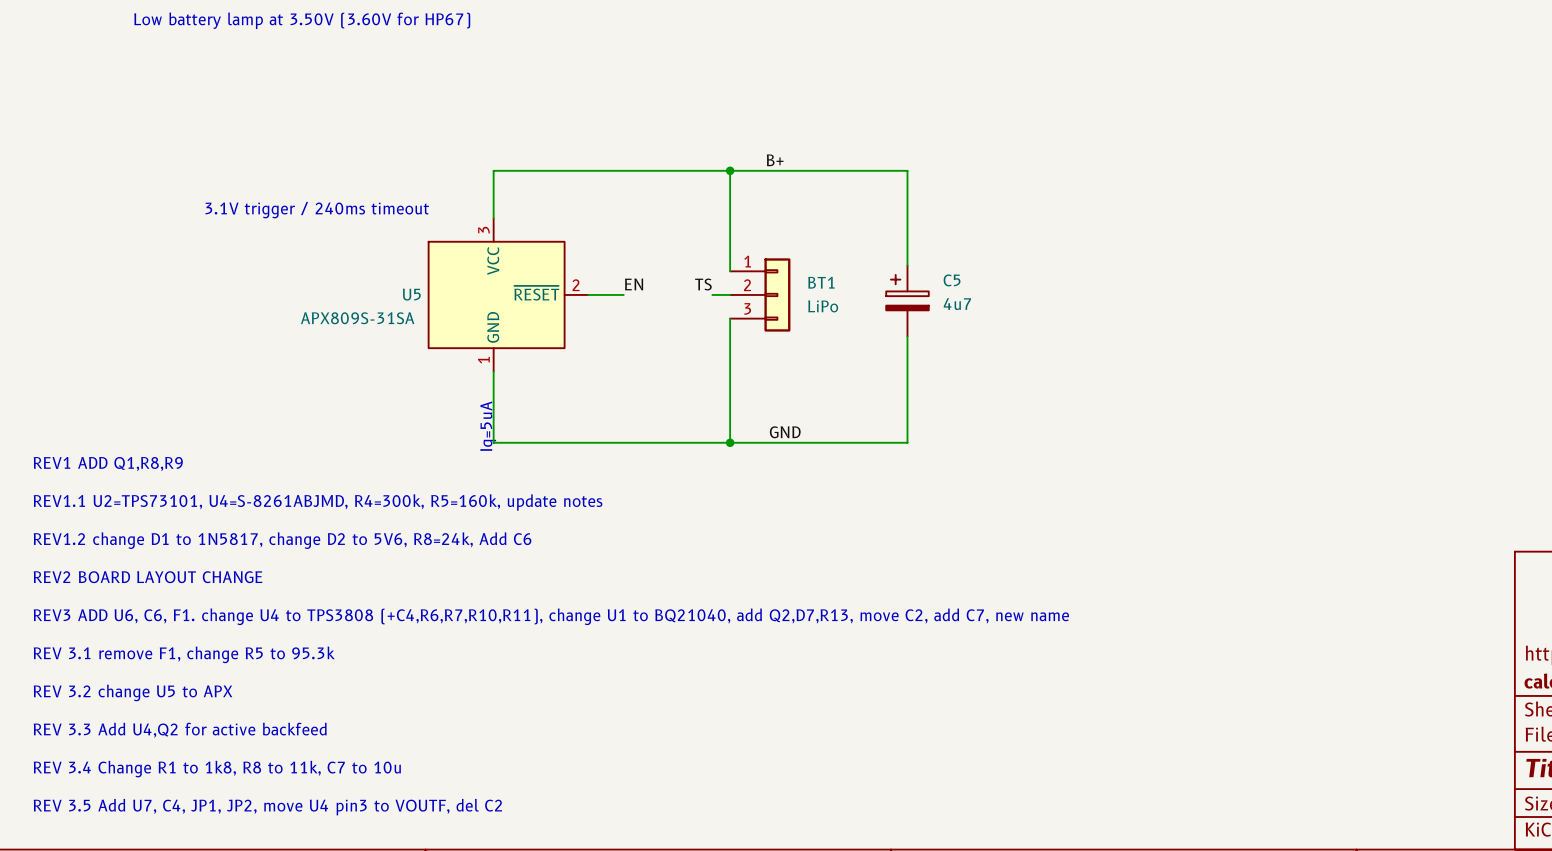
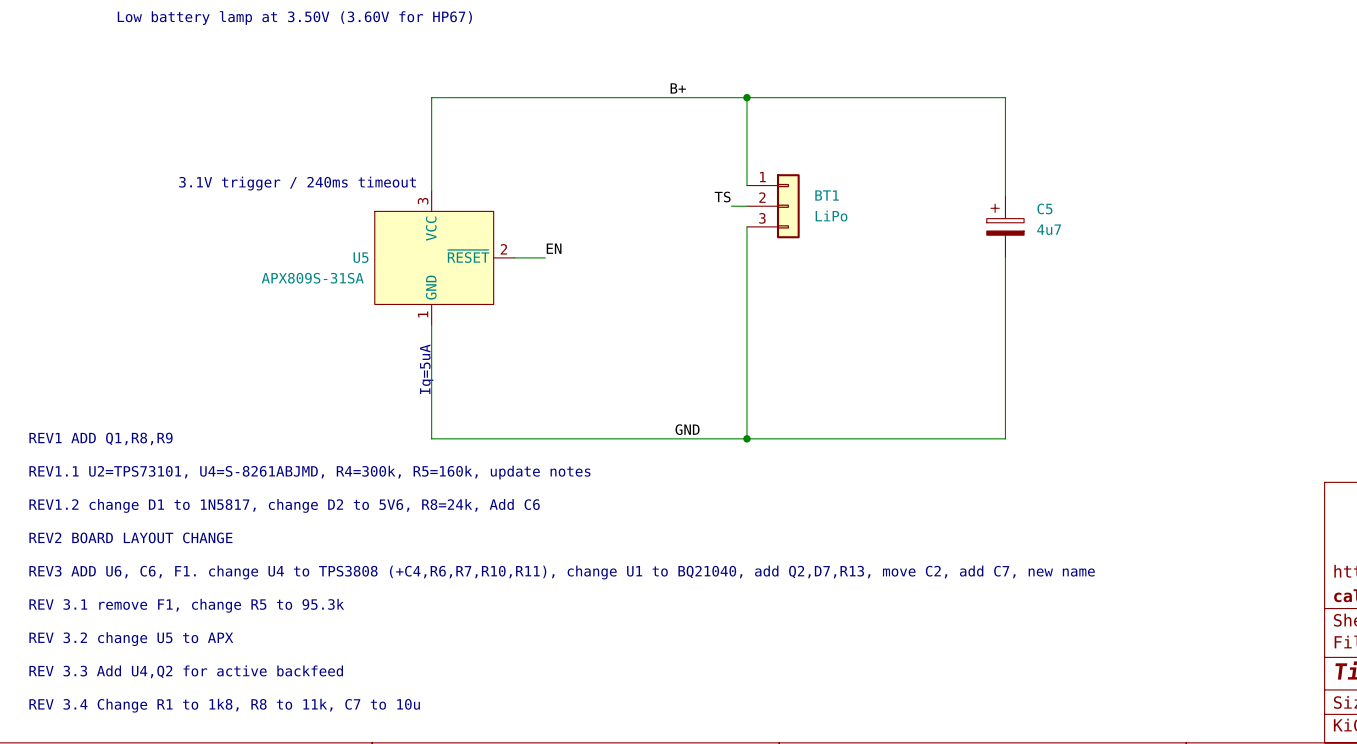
junction: none -> (746, 97)
label position: B+ (775, 160) -> B+ (678, 88)
wire: (493, 170) (907, 170) (907, 265) -> (431, 149) (431, 97) (1005, 97) (1005, 195)
wire: (730, 170) (730, 271) -> (746, 97) (746, 185)
junction: (730, 170) -> none
wire: none -> (746, 226) (746, 438)
label position: TS (703, 284) -> TS (722, 197)
wire: (712, 294) (730, 294) -> (731, 206) (746, 206)
BT1 position: (760, 294) -> (773, 206)
C5 position: (907, 300) -> (1005, 226)
wire: (730, 318) (730, 442) -> none
wire: (907, 336) (907, 442) (493, 442) -> (1005, 257) (1005, 438) (431, 438) (431, 387)
label position: GND (785, 432) -> GND (687, 429)
junction: (730, 442) -> none
text: REV1 ADD Q1,R8,R9 (108, 464) -> none
junction: none -> (746, 438)
text: REV1.1 U2=TPS73101, U4=S-8261ABJMD, R4=300k, R5=160k, update notes (318, 502) -> REV1 ADD Q1,R8,R9 (101, 438)
text: REV1.2 change D1 to 1N5817, change D2 to 5V6, R8=24k, Add C6 (282, 540) -> REV1.1 U2=TPS73101, U4=S-8261ABJMD, R4=300k, R5=160k, update notes (309, 472)
text: REV2 BOARD LAYOUT CHANGE (148, 577) -> REV1.2 change D1 to 1N5817, change D2 to 5V6, R8=24k, Add C6 (284, 505)
text: REV3 ADD U6, C6, F1. change U4 to TPS3808 (+C4,R6,R7,R10,R11), change U1 to BQ21040, add Q2,D7,R13, move C2, add C7, new name (551, 616) -> REV2 BOARD LAYOUT CHANGE (130, 537)
text: REV 3.1 remove F1, change R5 to 95.3k (184, 654) -> REV3 ADD U6, C6, F1. change U4 to TPS3808 (+C4,R6,R7,R10,R11), change U1 to BQ21040, add Q2,D7,R13, move C2, add C7, new name (562, 572)
text: REV 3.2 change U5 to APX (133, 692) -> REV 3.1 remove F1, change R5 to 95.3k (186, 605)
text: REV 3.3 Add U4,Q2 for active backfeed (180, 730) -> REV 3.2 change U5 to APX (131, 639)
text: REV 3.4 Change R1 to 1k8, R8 to 11k, C7 to 10u (217, 769) -> REV 3.3 Add U4,Q2 for active backfeed (186, 671)
text: REV 3.5 Add U7, C4, JP1, JP2, move U4 pin3 to VOUTF, del C2 (267, 807) -> REV 3.4 Change R1 to 1k8, R8 to 11k, C7 to 10u (224, 705)

